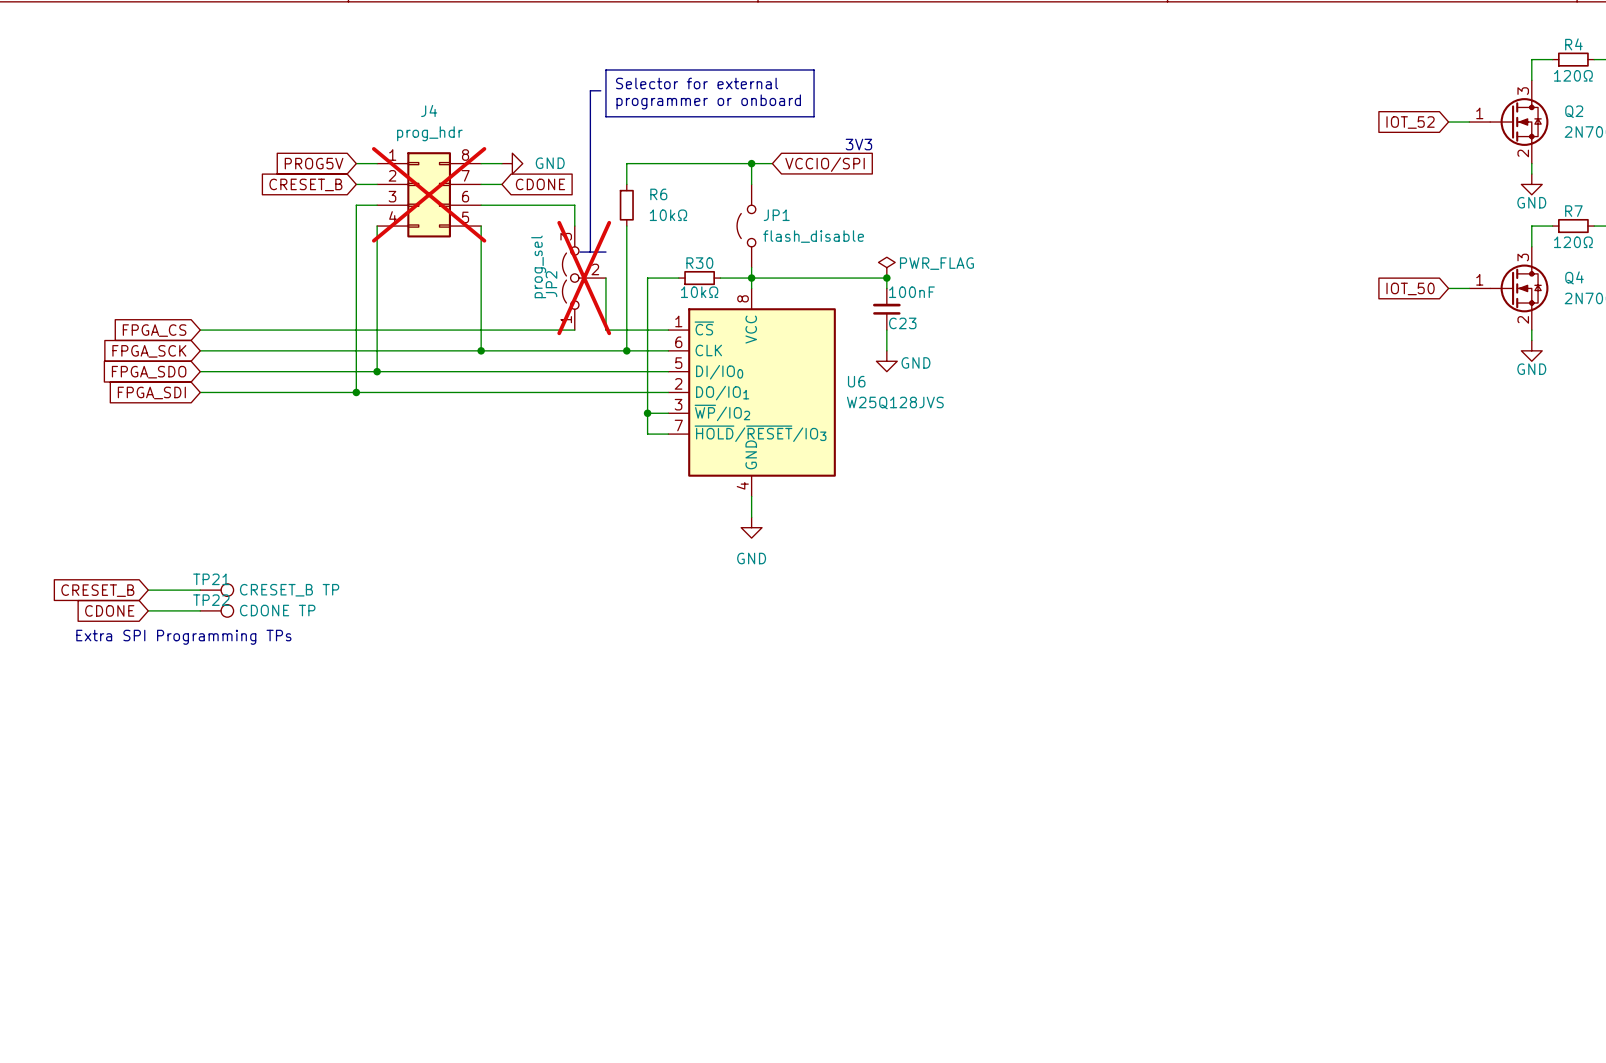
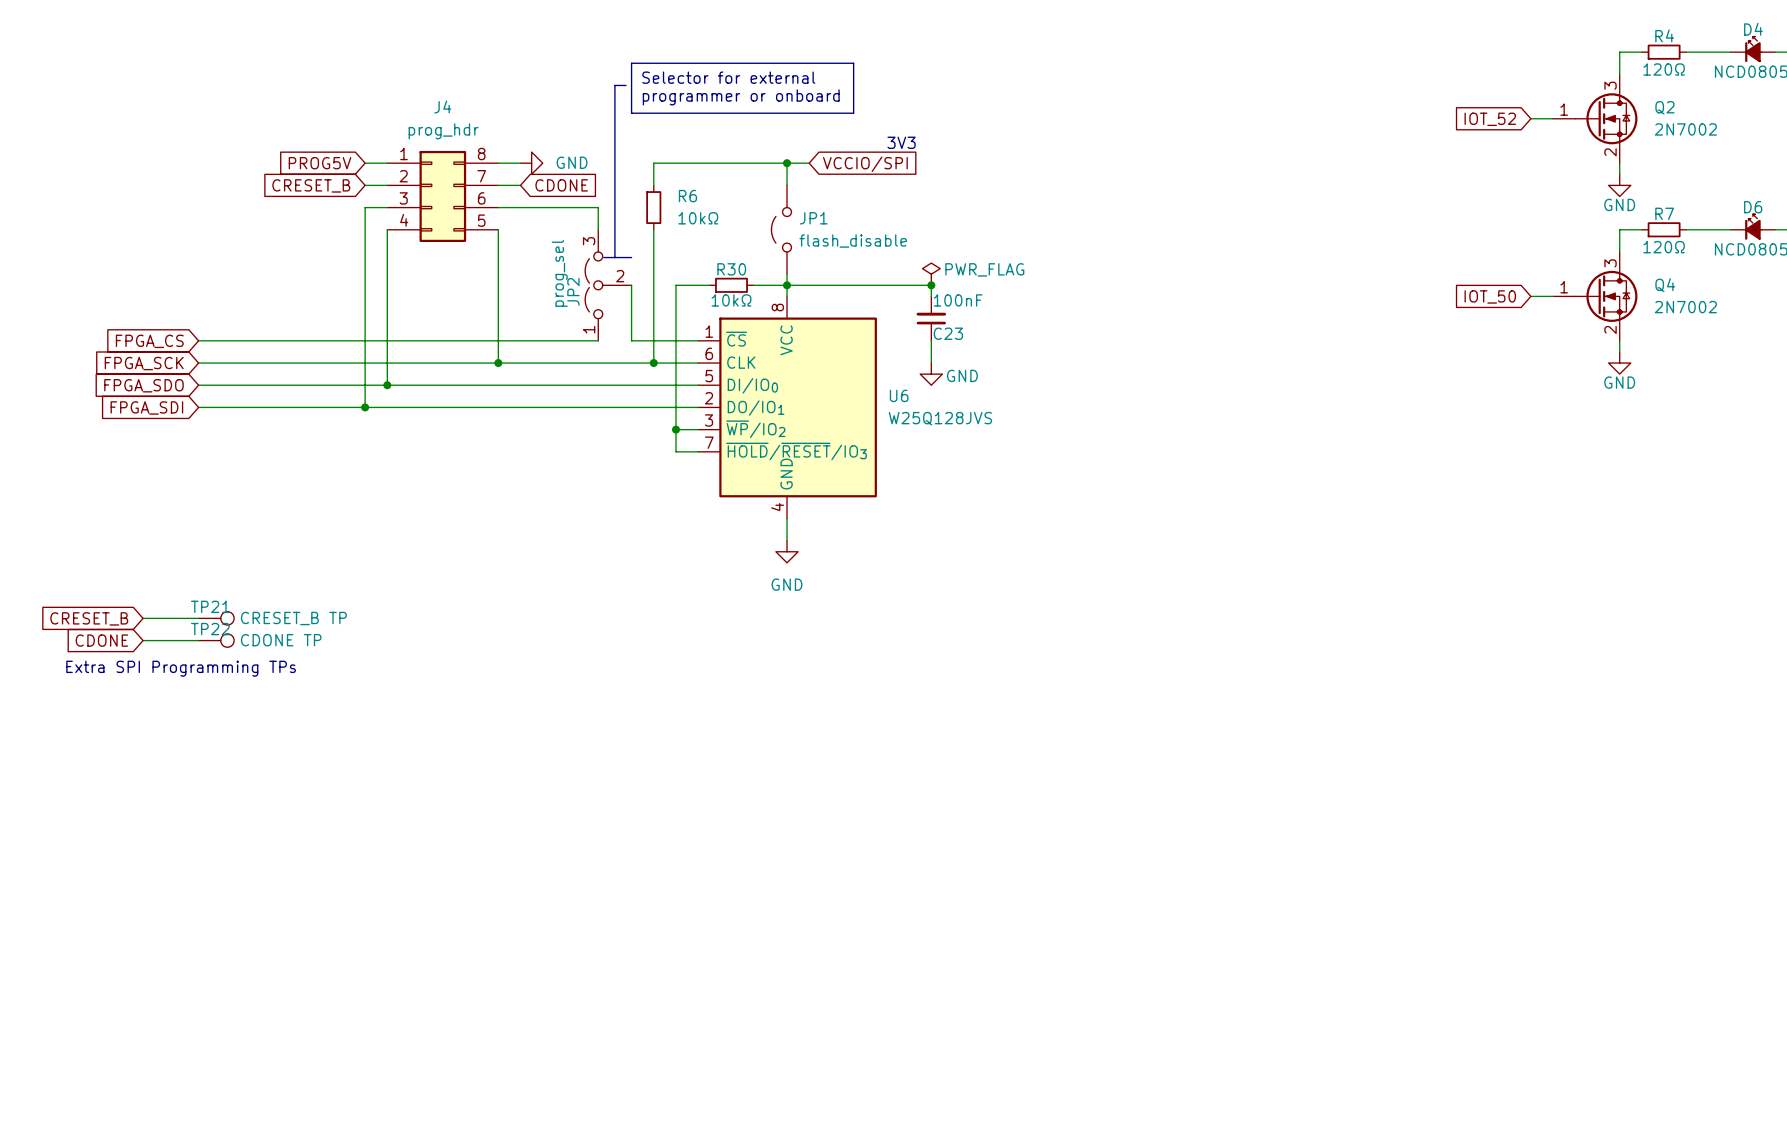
J4 do-not-place cross: (429, 194) -> none
JP2 do-not-place cross: (584, 278) -> none

